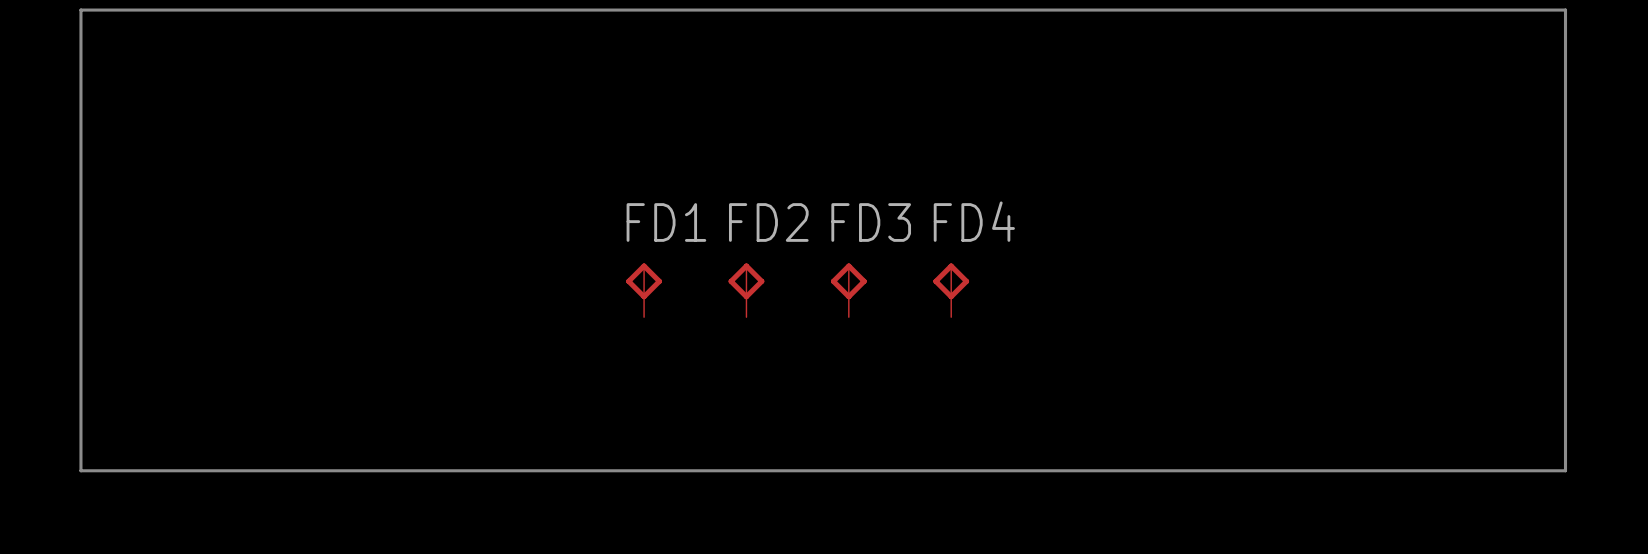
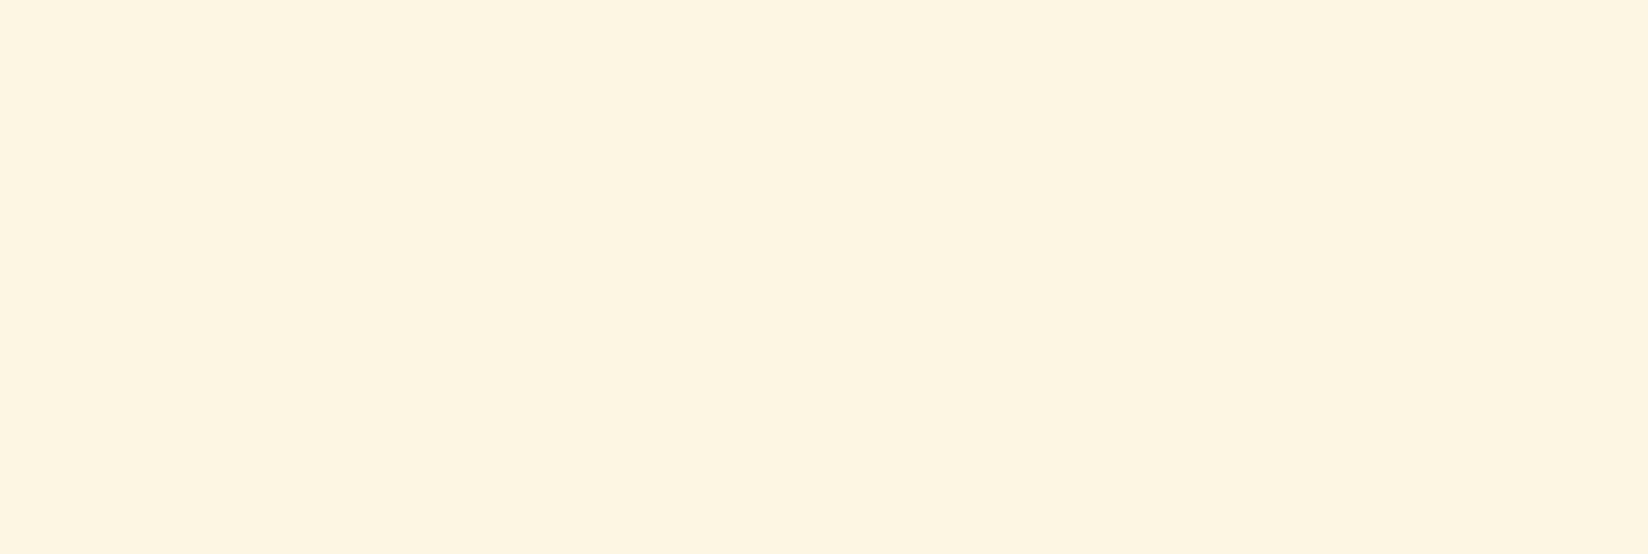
line: (80, 10) (80, 470) (1565, 470) (1565, 10) (80, 10) -> none
FD1: (644, 290) -> none
FD2: (746, 290) -> none
FD3: (848, 290) -> none
FD4: (951, 290) -> none

